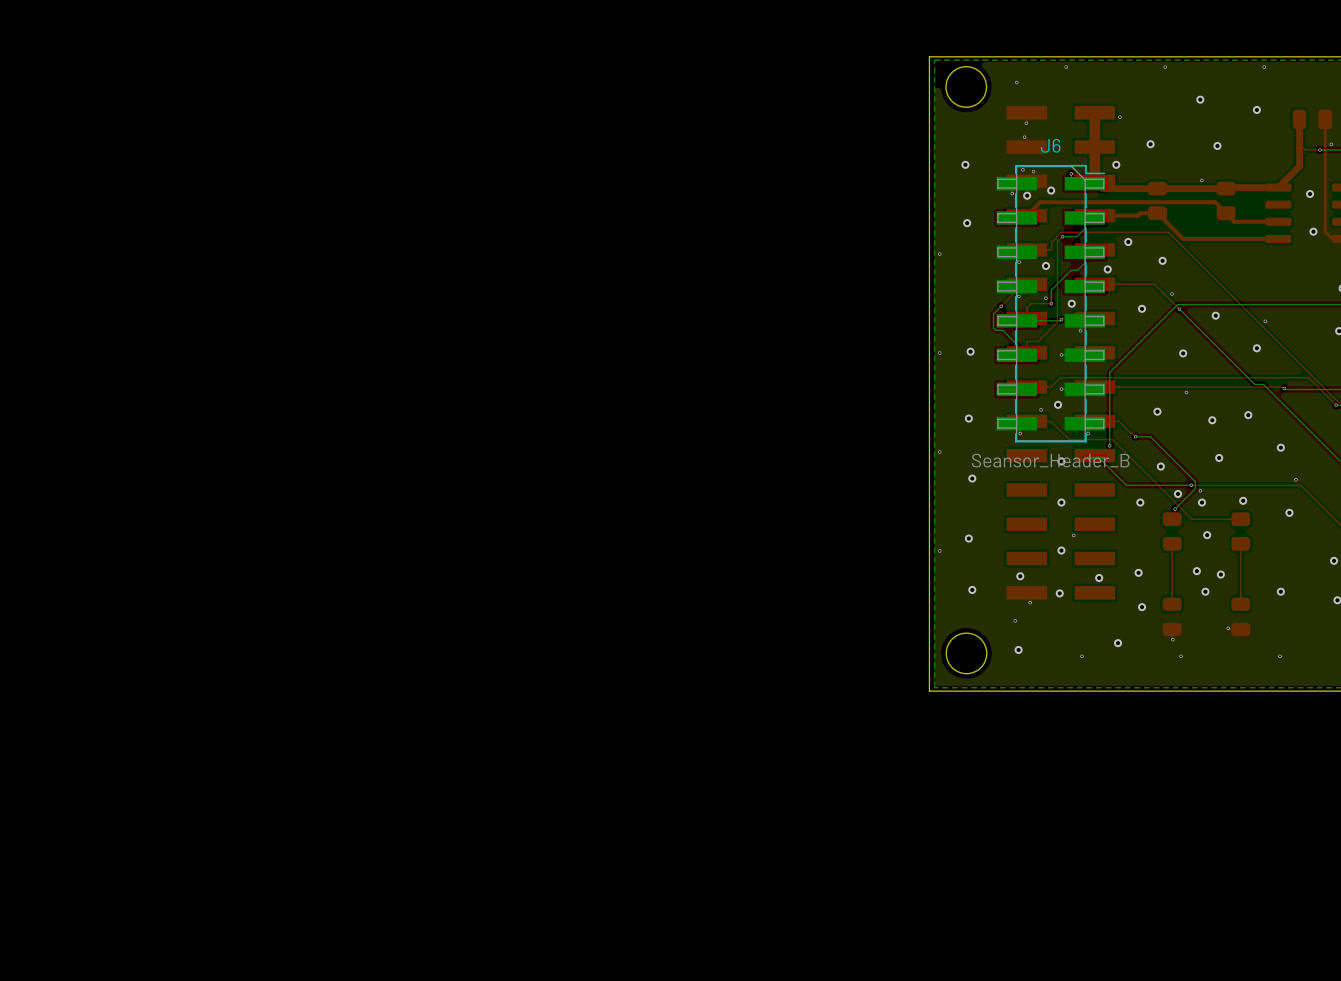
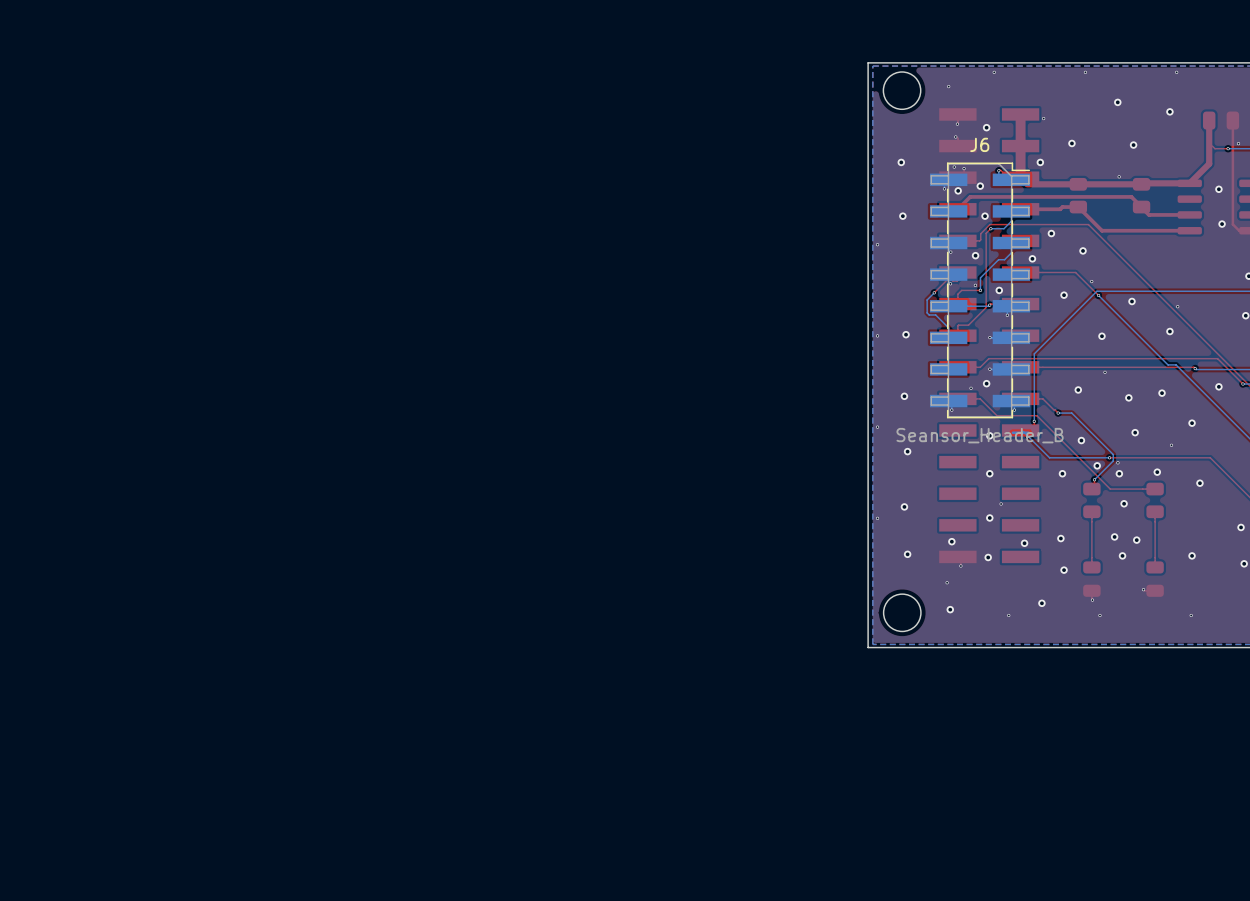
via: none -> (986, 127)
via: none -> (985, 216)
via: none -> (1218, 386)
via position: (1295, 479) -> (1171, 445)

